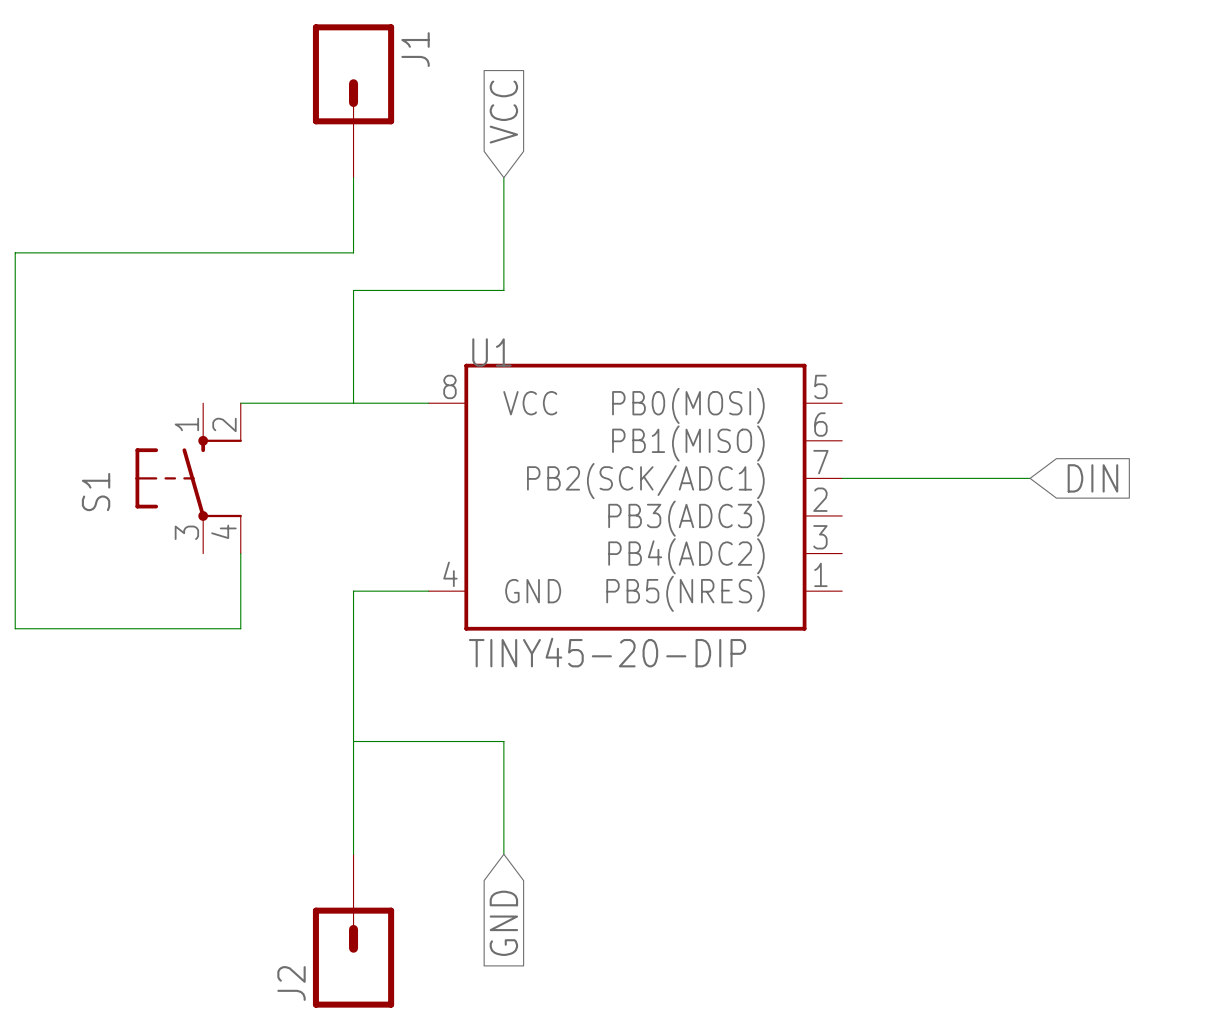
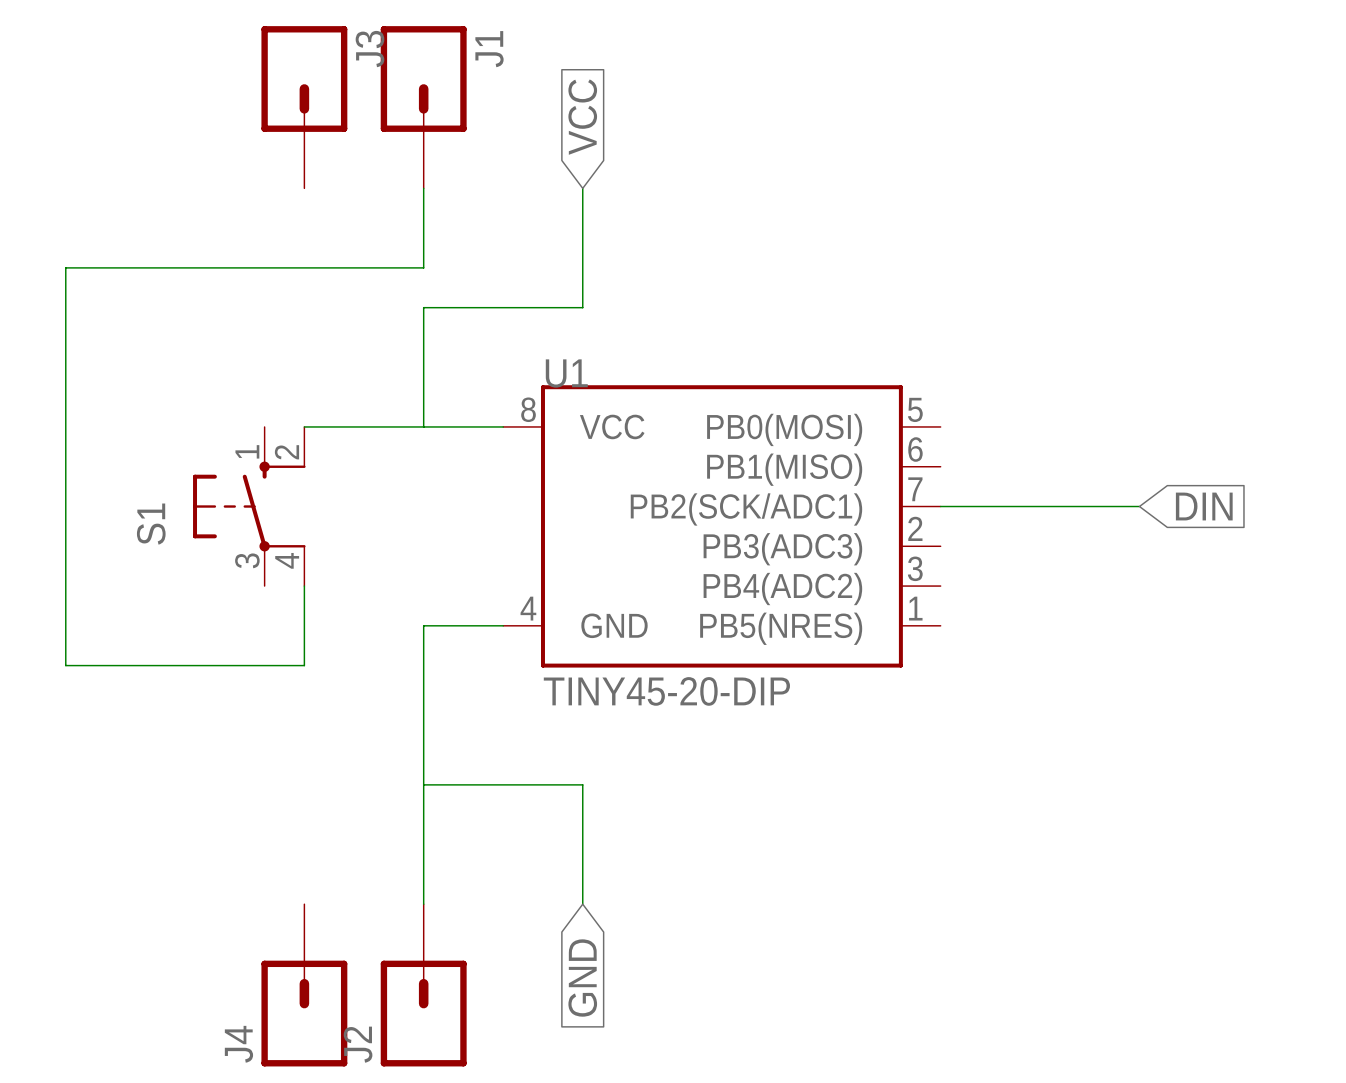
J3: none -> (304, 107)
J4: none -> (304, 985)

